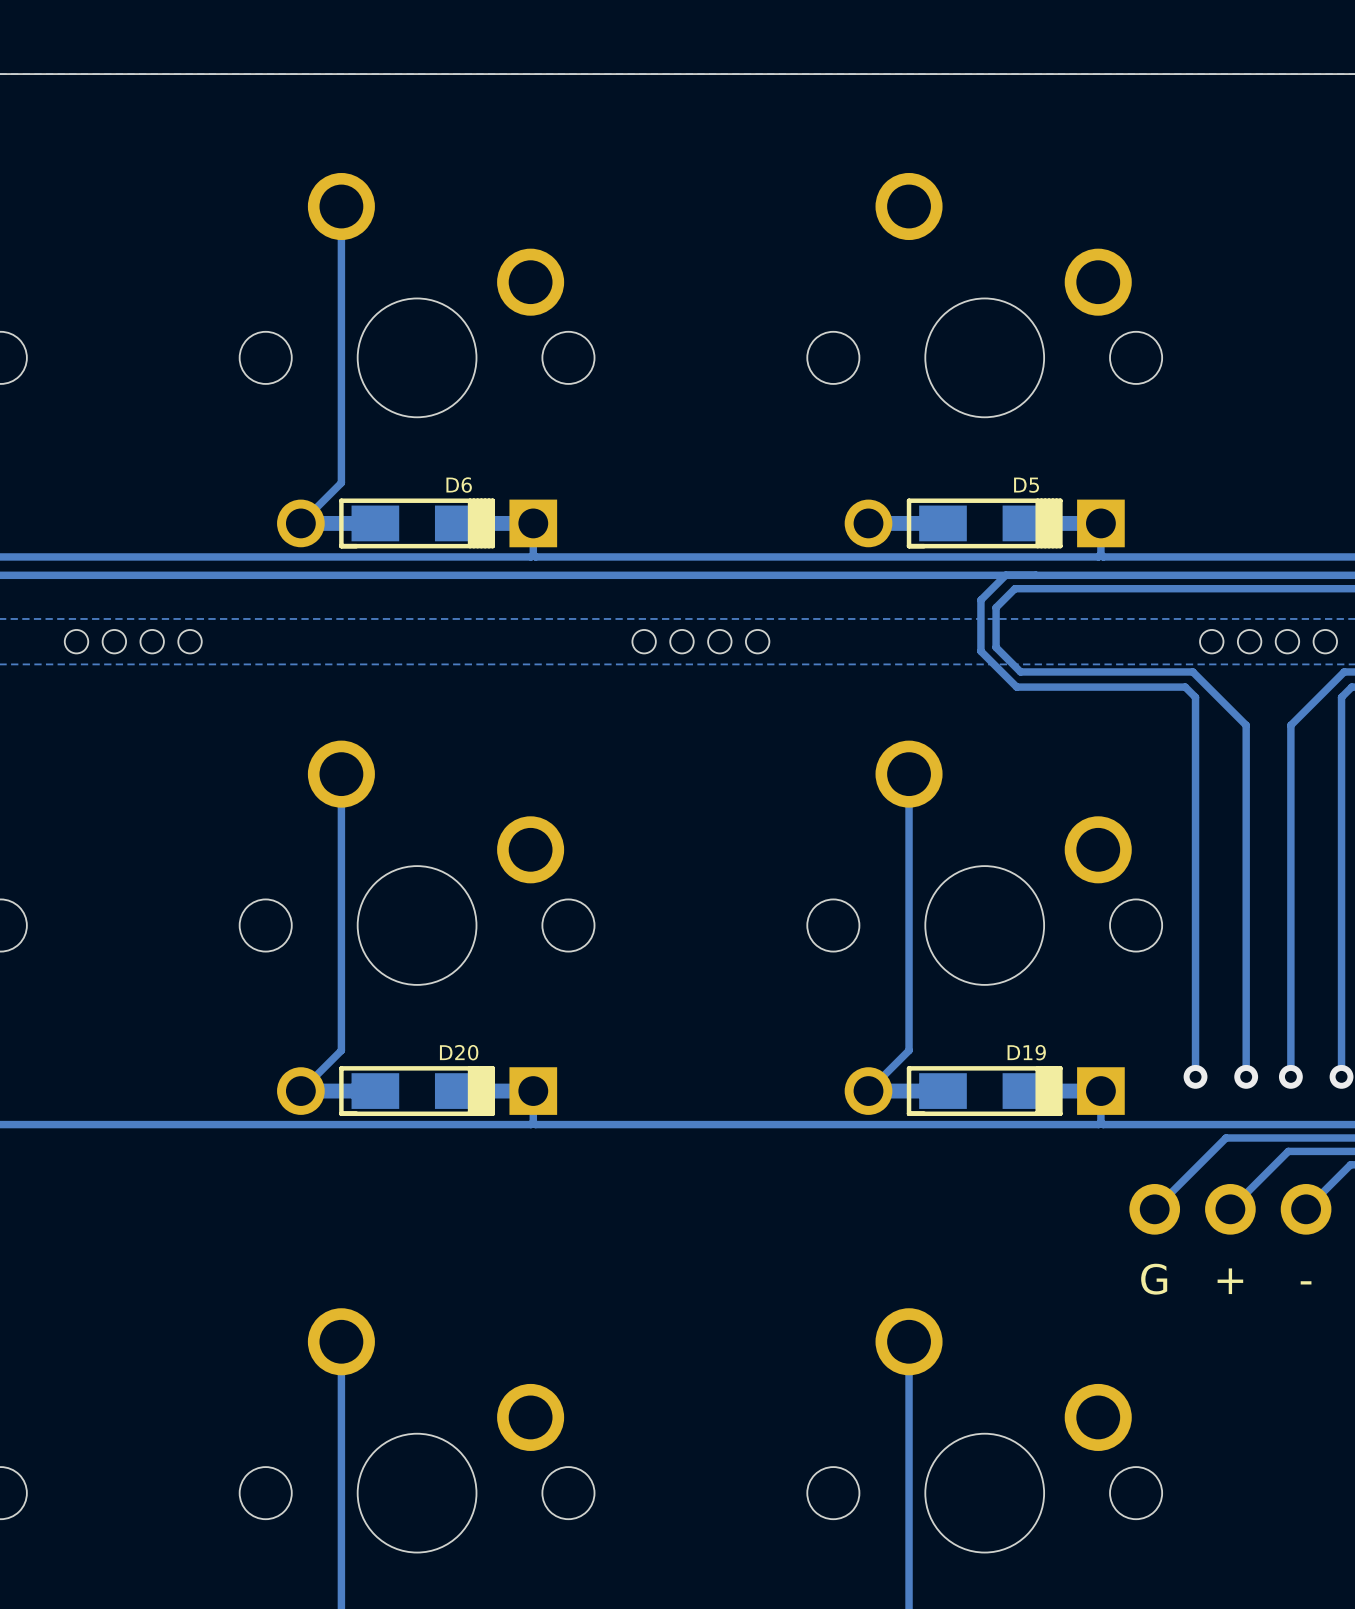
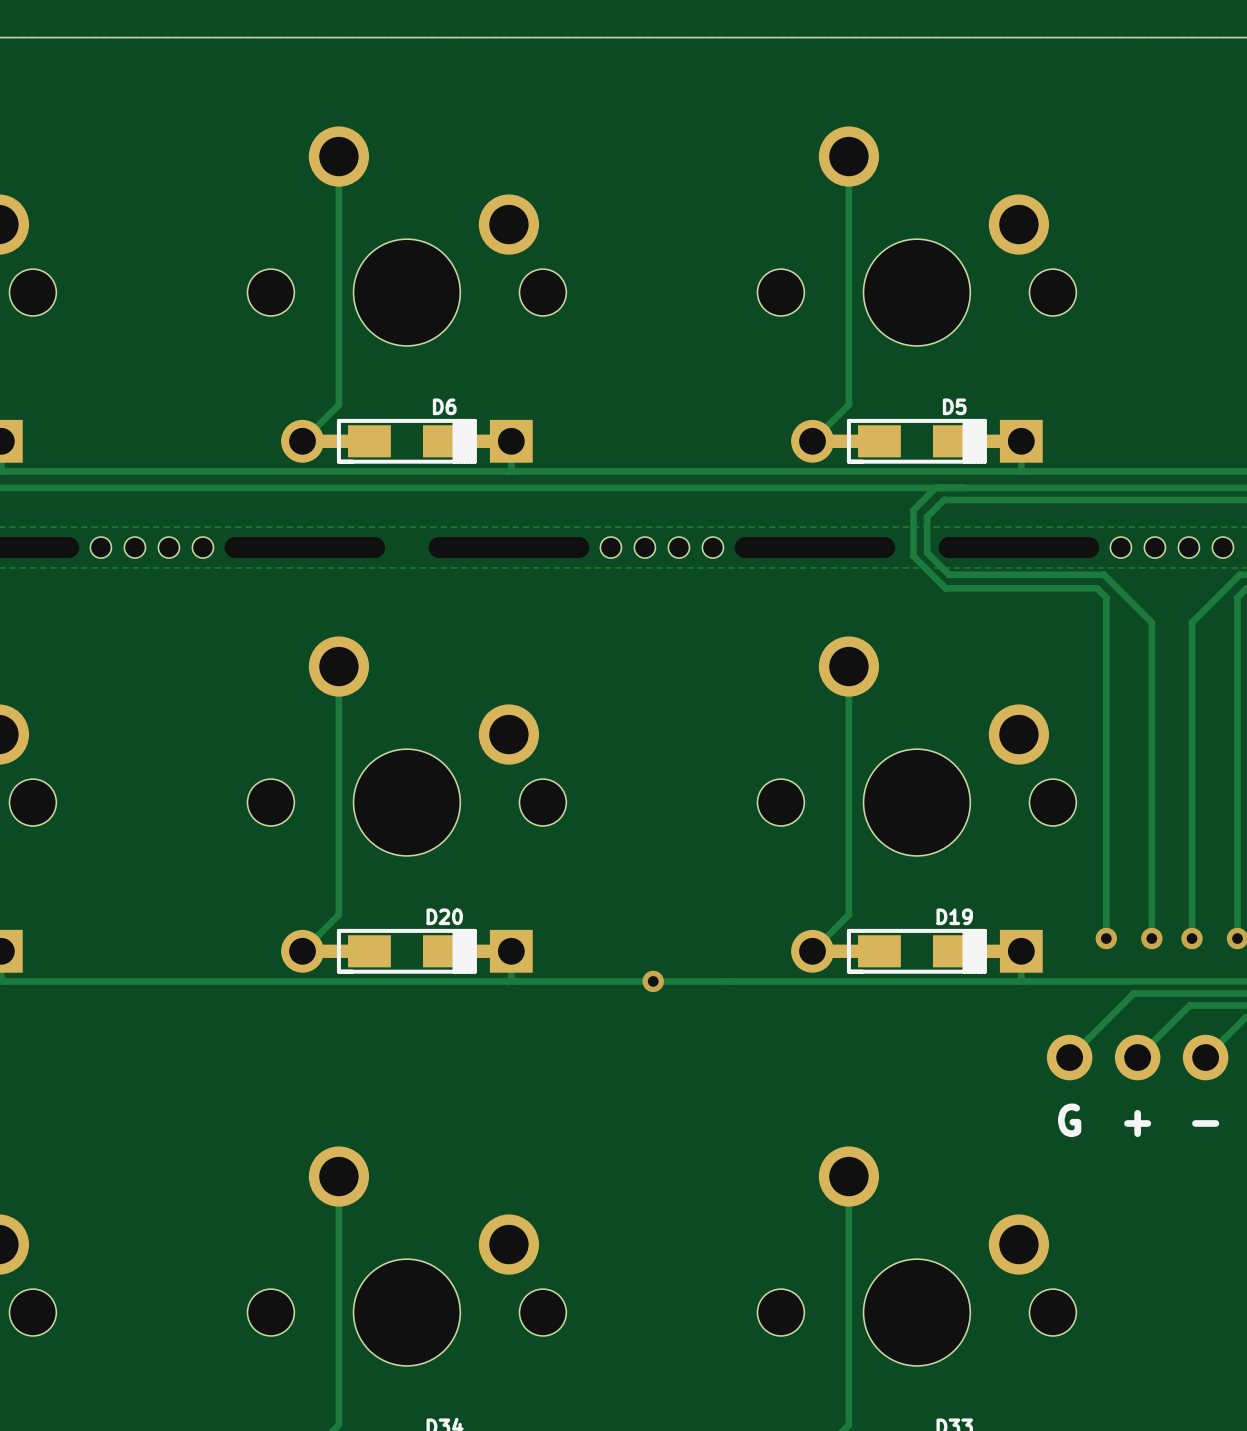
track: none -> (848, 156) (848, 404) (812, 441)
via: none -> (653, 981)

